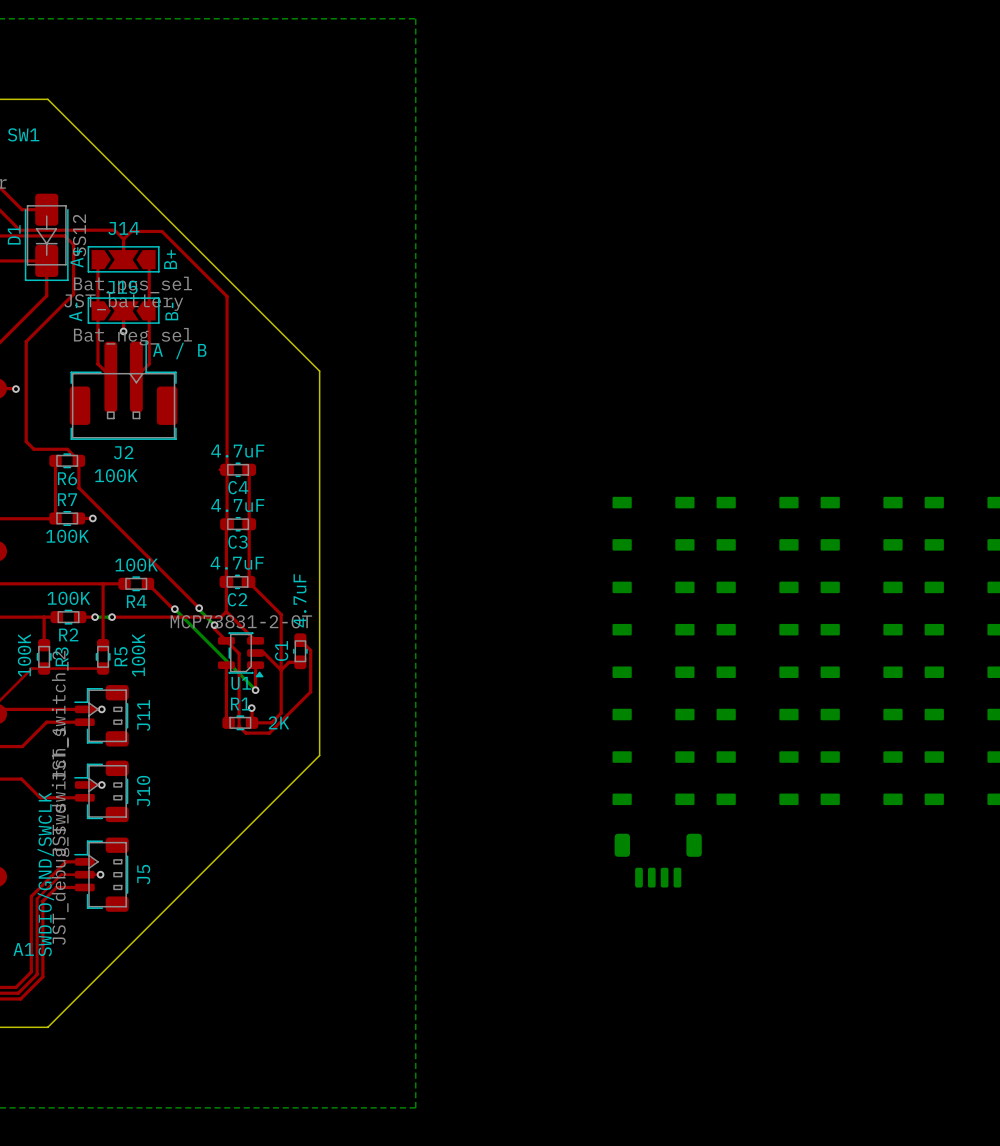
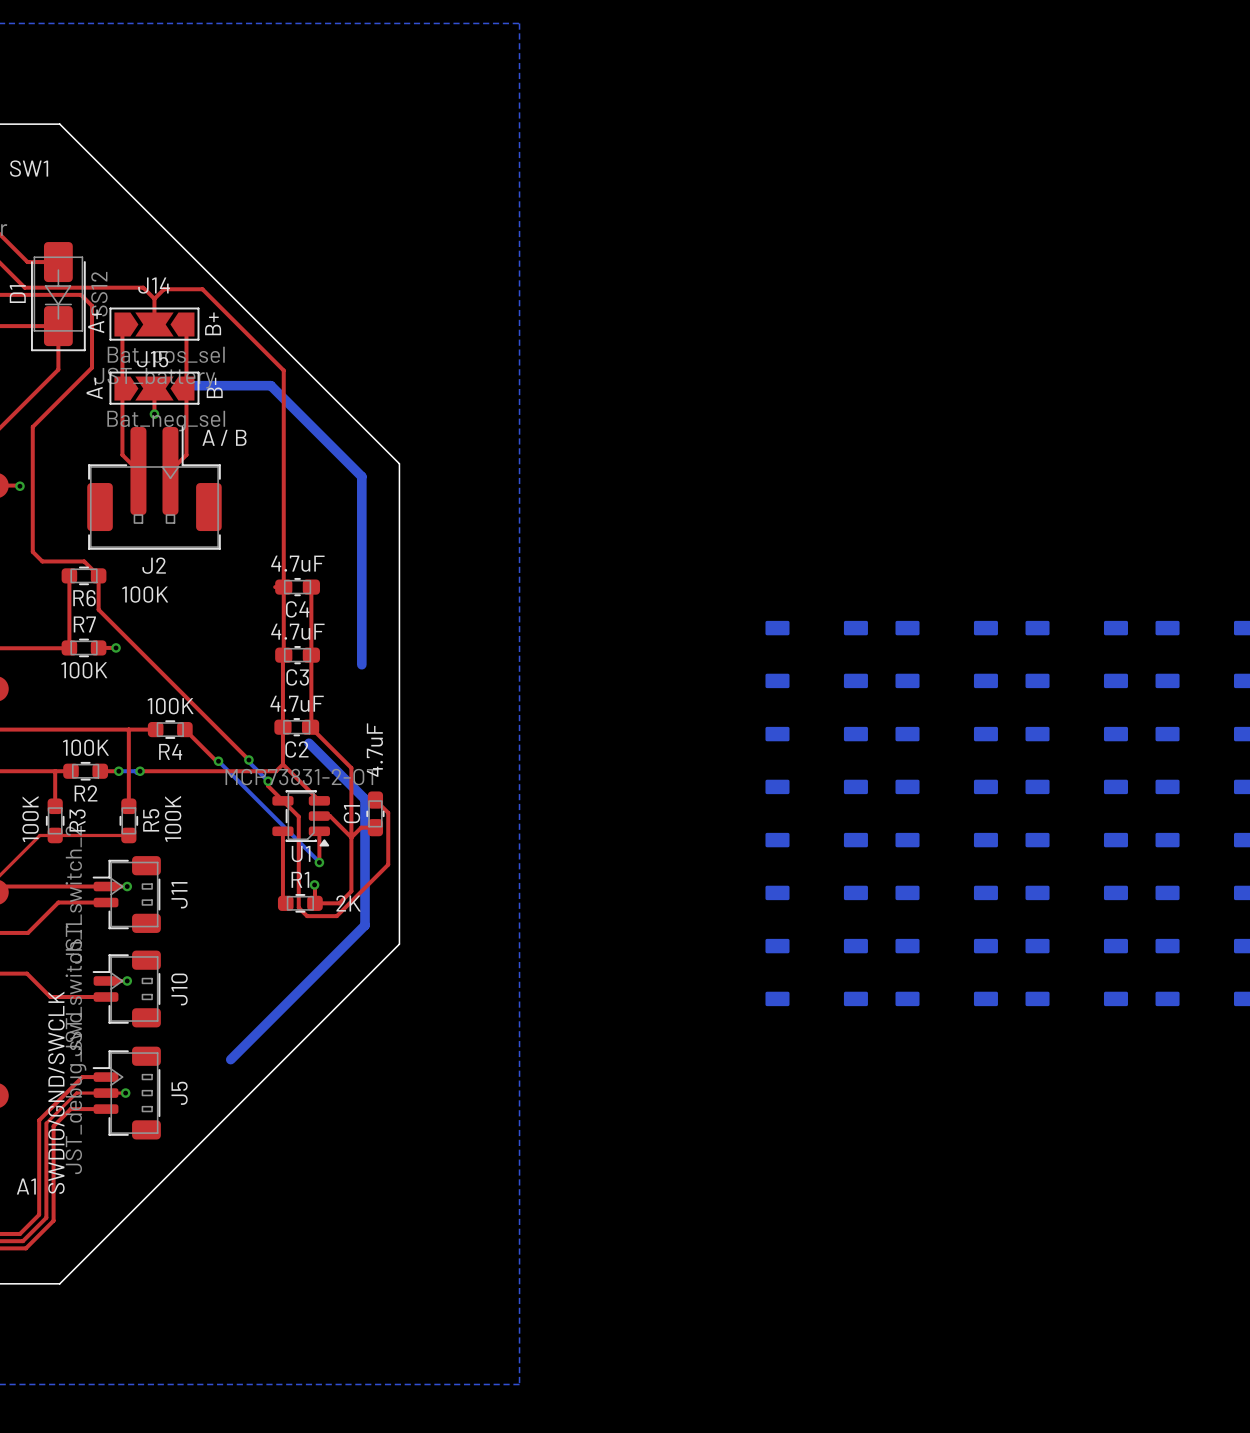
bottom track: none -> (193, 385) (270, 385) (361, 476) (361, 664)
bottom track: none -> (308, 743) (365, 799) (365, 925) (230, 1059)
part: (658, 860) -> none

